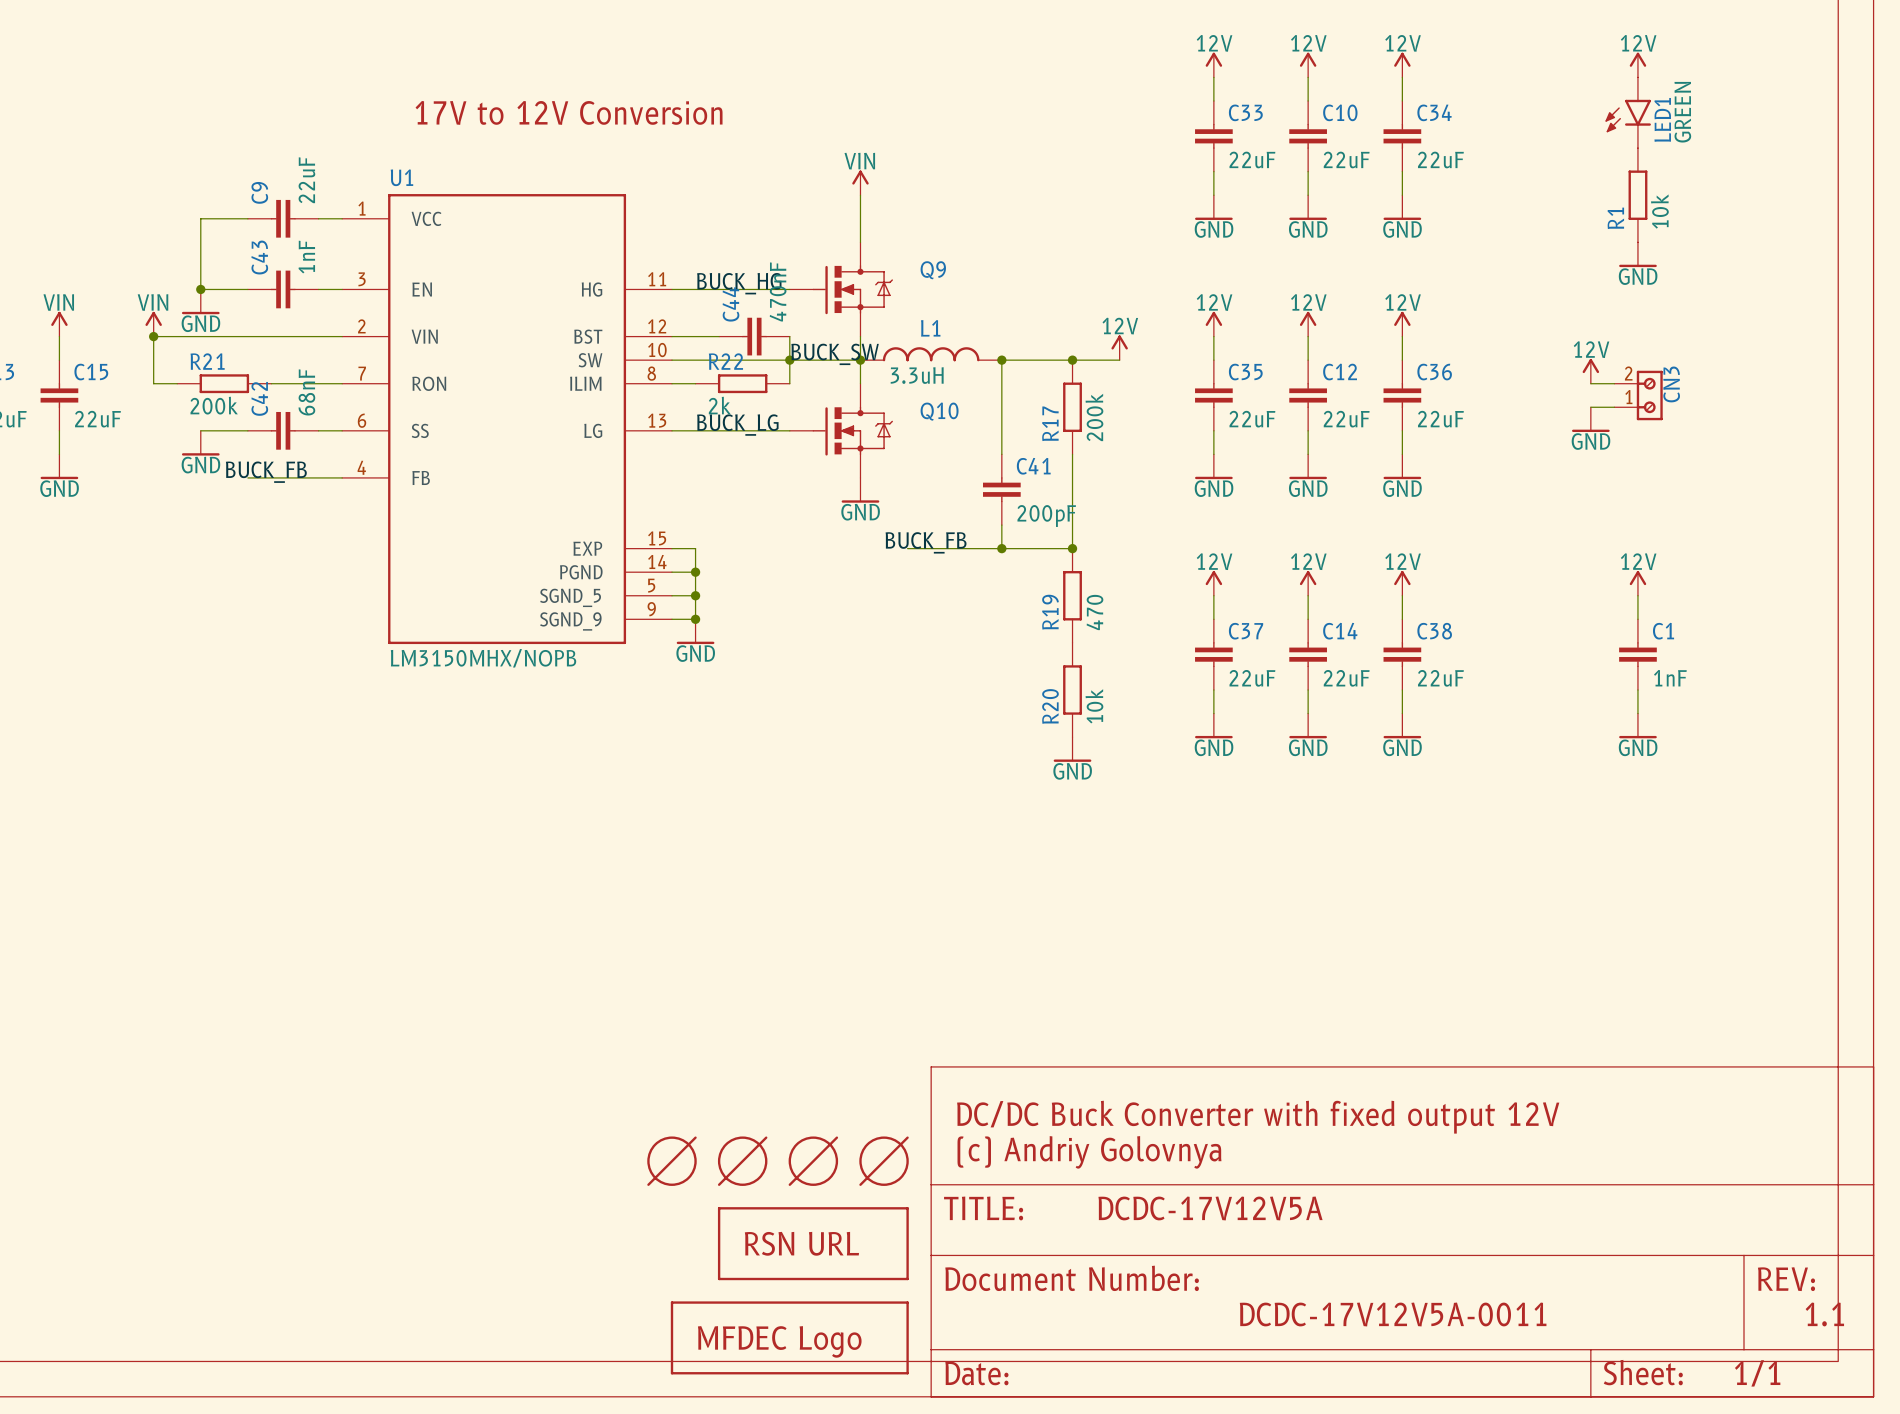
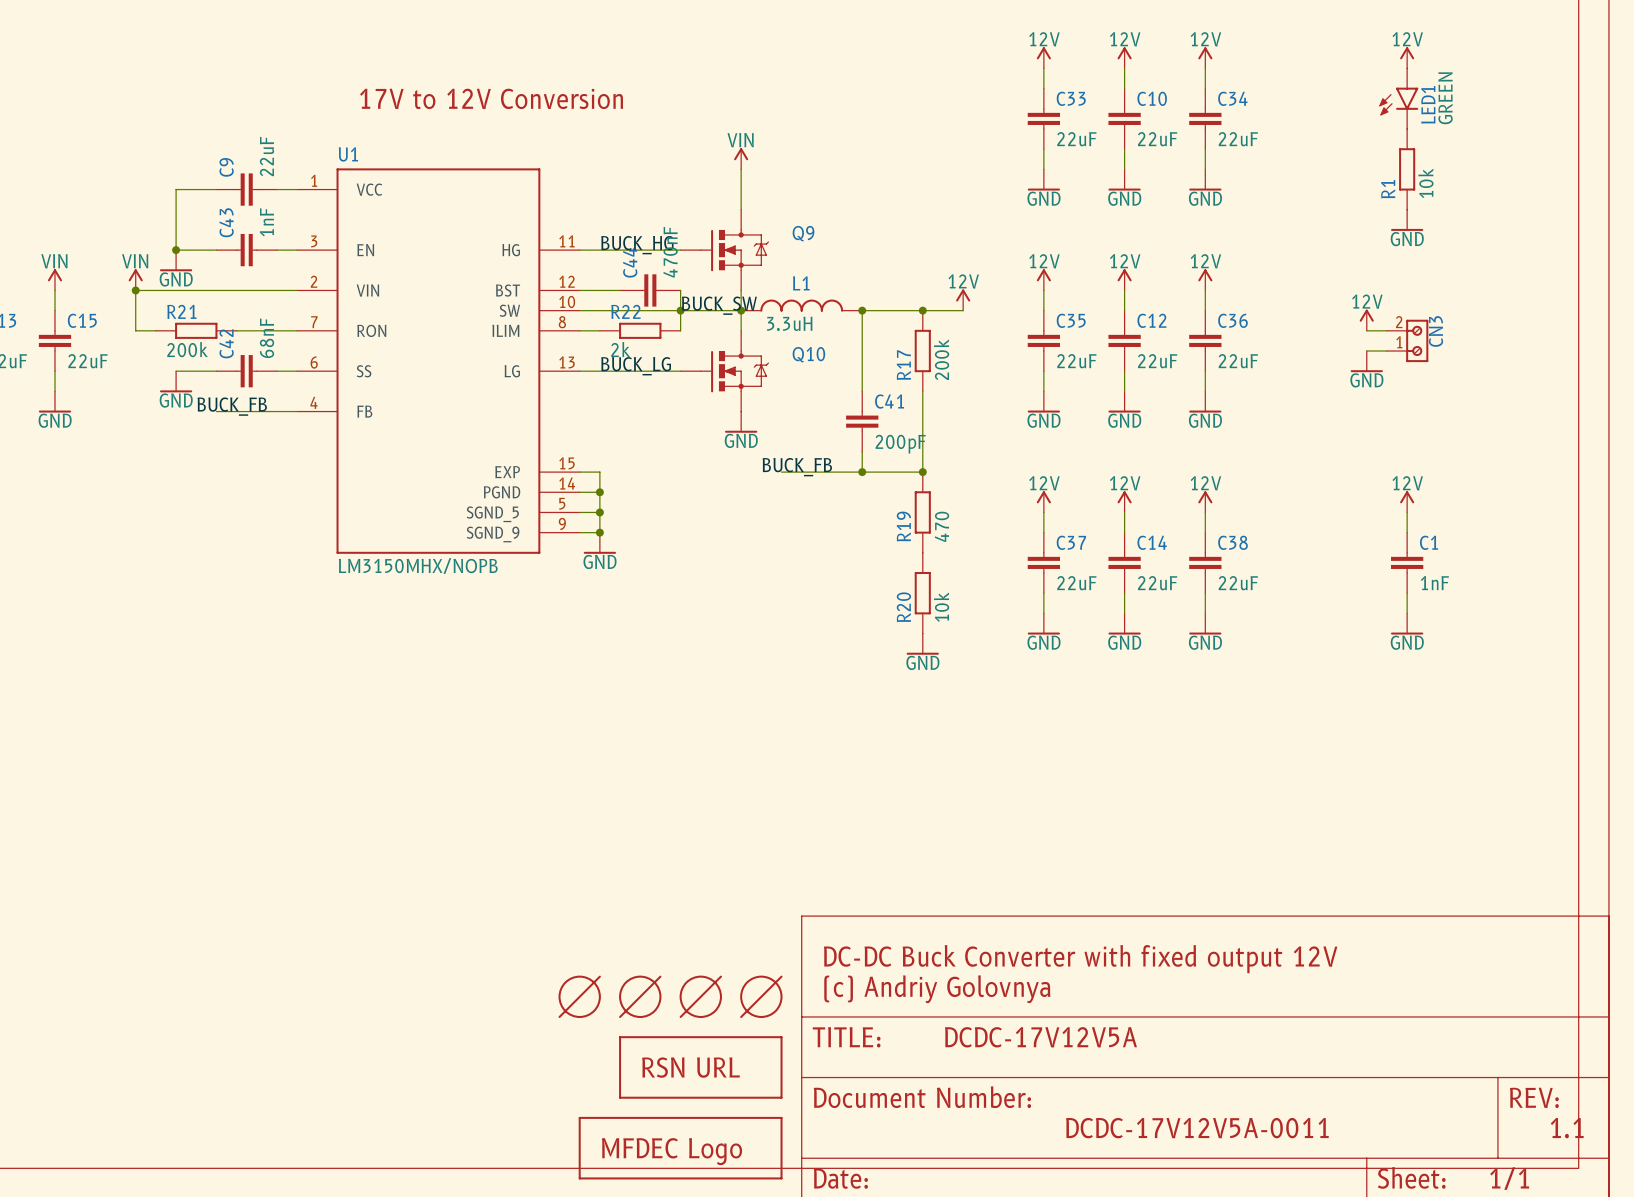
text: DC/DC Buck Converter with fixed output 12V (1258, 1117) -> DC-DC Buck Converter with fixed output 12V (1080, 959)

